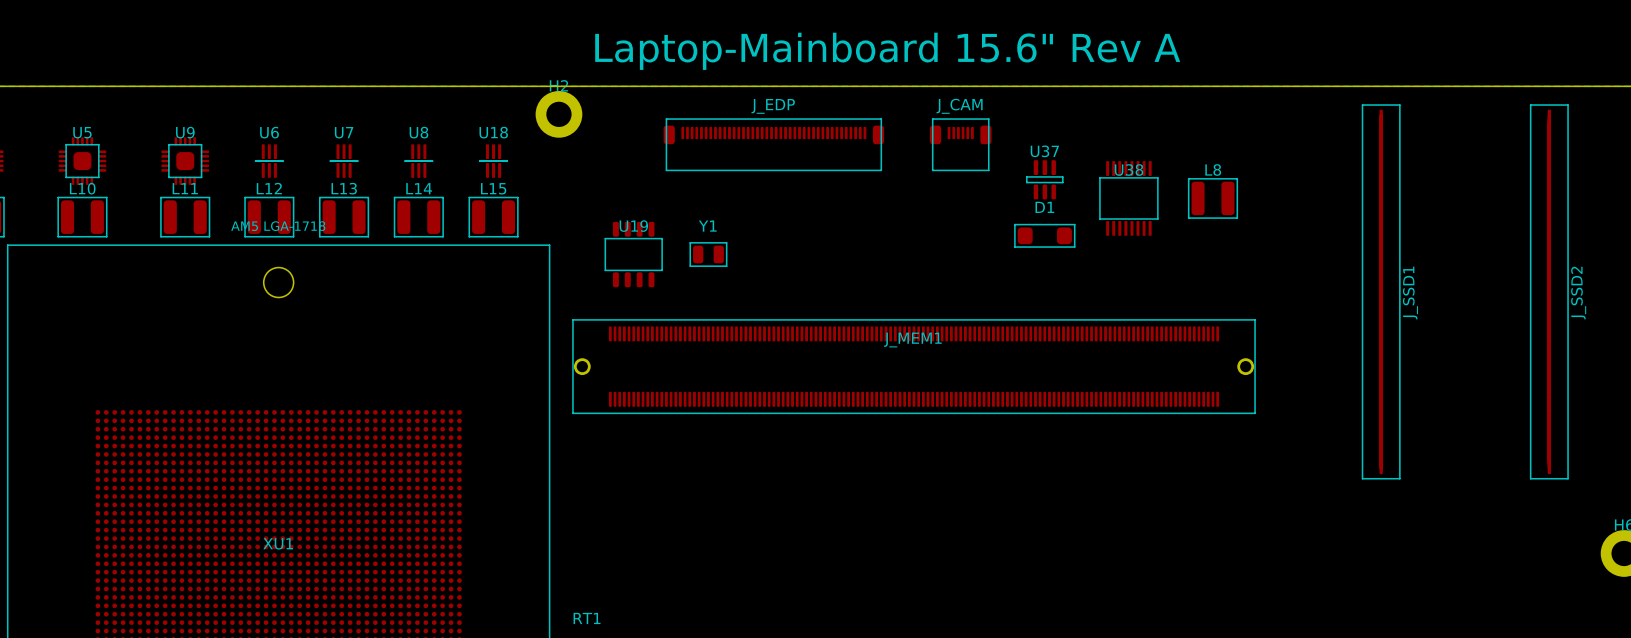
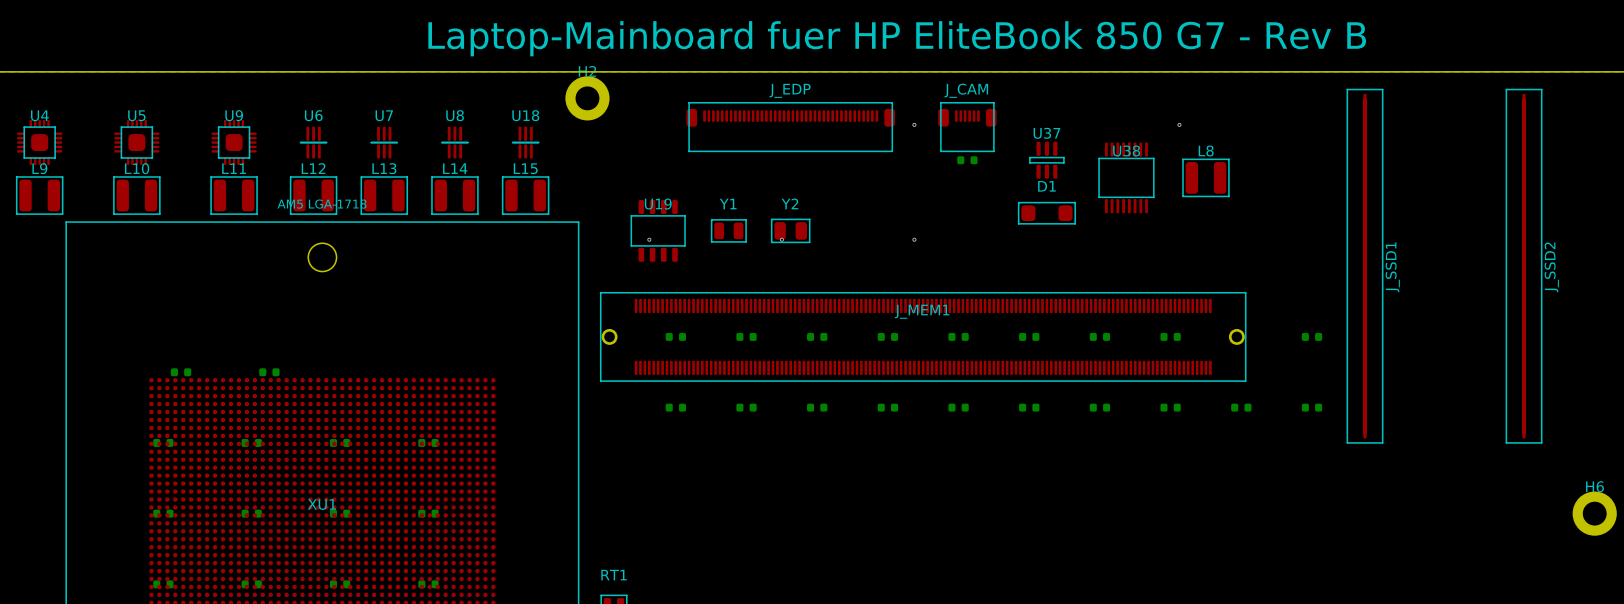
text: Laptop-Mainboard 15.6" Rev A (887, 51) -> Laptop-Mainboard fuer HP EliteBook 850 G7 - Rev B (897, 38)
via: none -> (914, 124)
via: none -> (1179, 124)
part: none -> (967, 160)
Y2: none -> (790, 230)
via: none -> (649, 239)
via: none -> (781, 239)
via: none -> (914, 239)
part: none -> (675, 336)
part: none -> (746, 336)
part: none -> (817, 336)
part: none -> (887, 336)
part: none -> (958, 336)
part: none -> (1029, 336)
part: none -> (1099, 336)
part: none -> (1170, 336)
part: none -> (1311, 336)
part: none -> (181, 372)
part: none -> (269, 372)
part: none -> (675, 407)
part: none -> (746, 407)
part: none -> (817, 407)
part: none -> (887, 407)
part: none -> (958, 407)
part: none -> (1029, 407)
part: none -> (1099, 407)
part: none -> (1170, 407)
part: none -> (1241, 407)
part: none -> (1311, 407)
part: none -> (163, 442)
part: none -> (251, 442)
part: none -> (340, 442)
part: none -> (428, 442)
part: none -> (163, 513)
part: none -> (251, 513)
part: none -> (340, 513)
part: none -> (428, 513)
part: none -> (163, 584)
part: none -> (251, 584)
part: none -> (340, 584)
part: none -> (428, 584)

